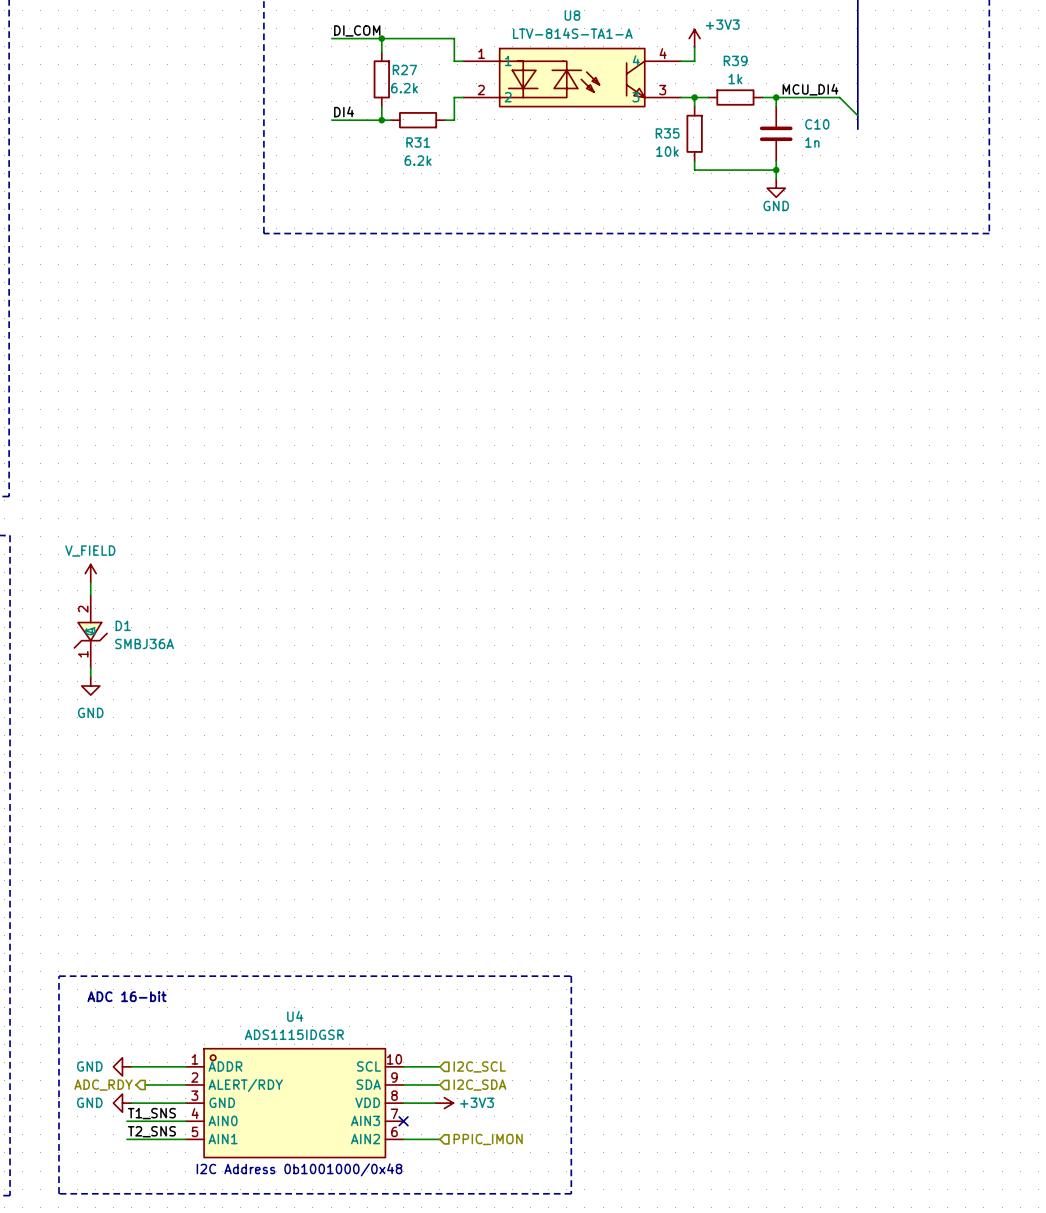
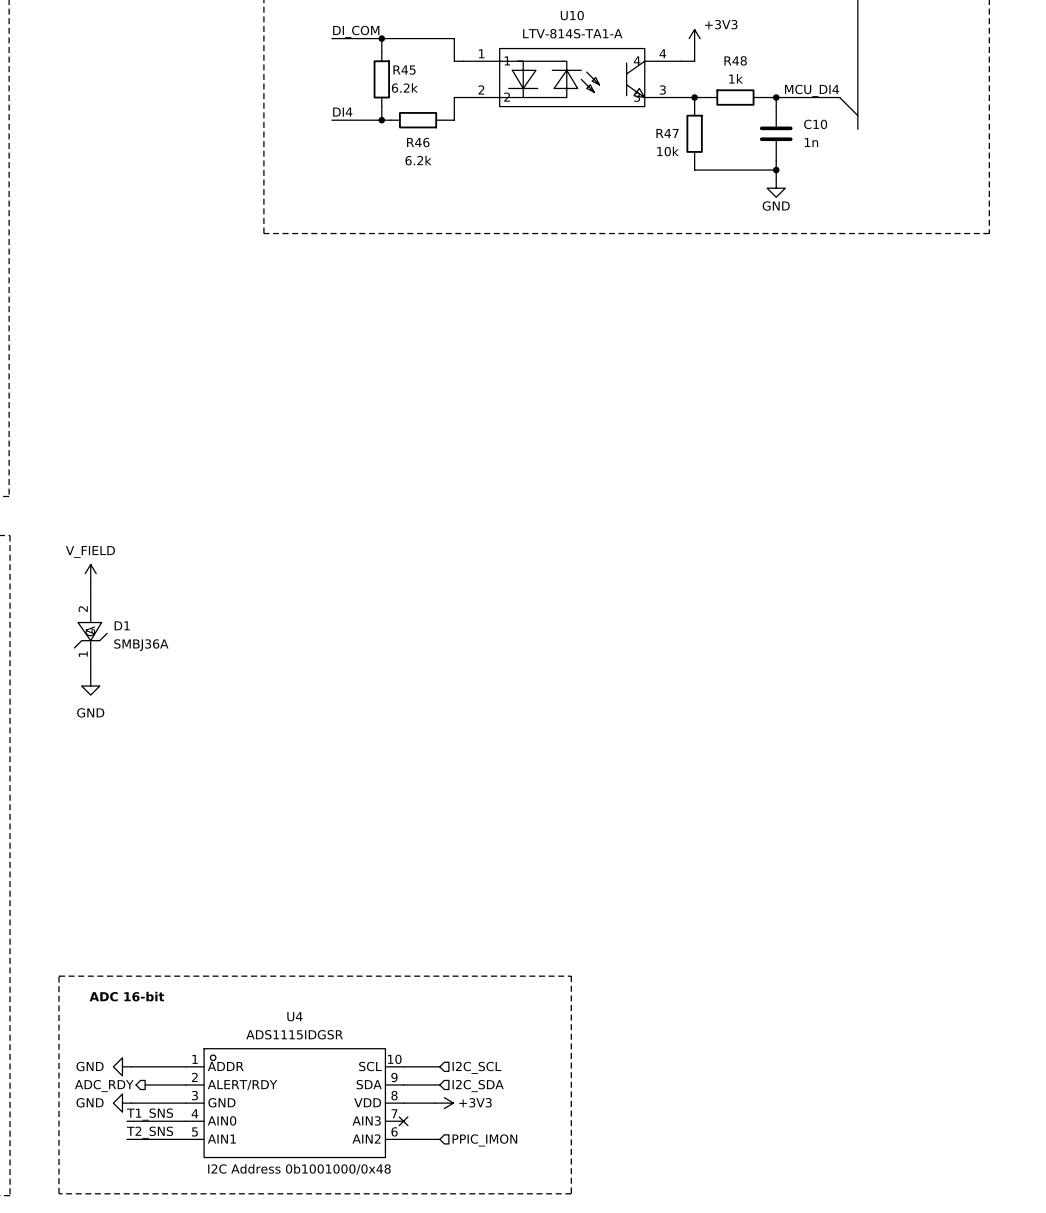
U8 name: U8 (572, 15) -> U10 (572, 15)
R39 name: R39 (735, 60) -> R48 (735, 60)
R27 name: R27 (404, 69) -> R45 (404, 70)
R35 name: R35 (667, 133) -> R47 (667, 133)
R31 name: R31 (418, 142) -> R46 (418, 142)

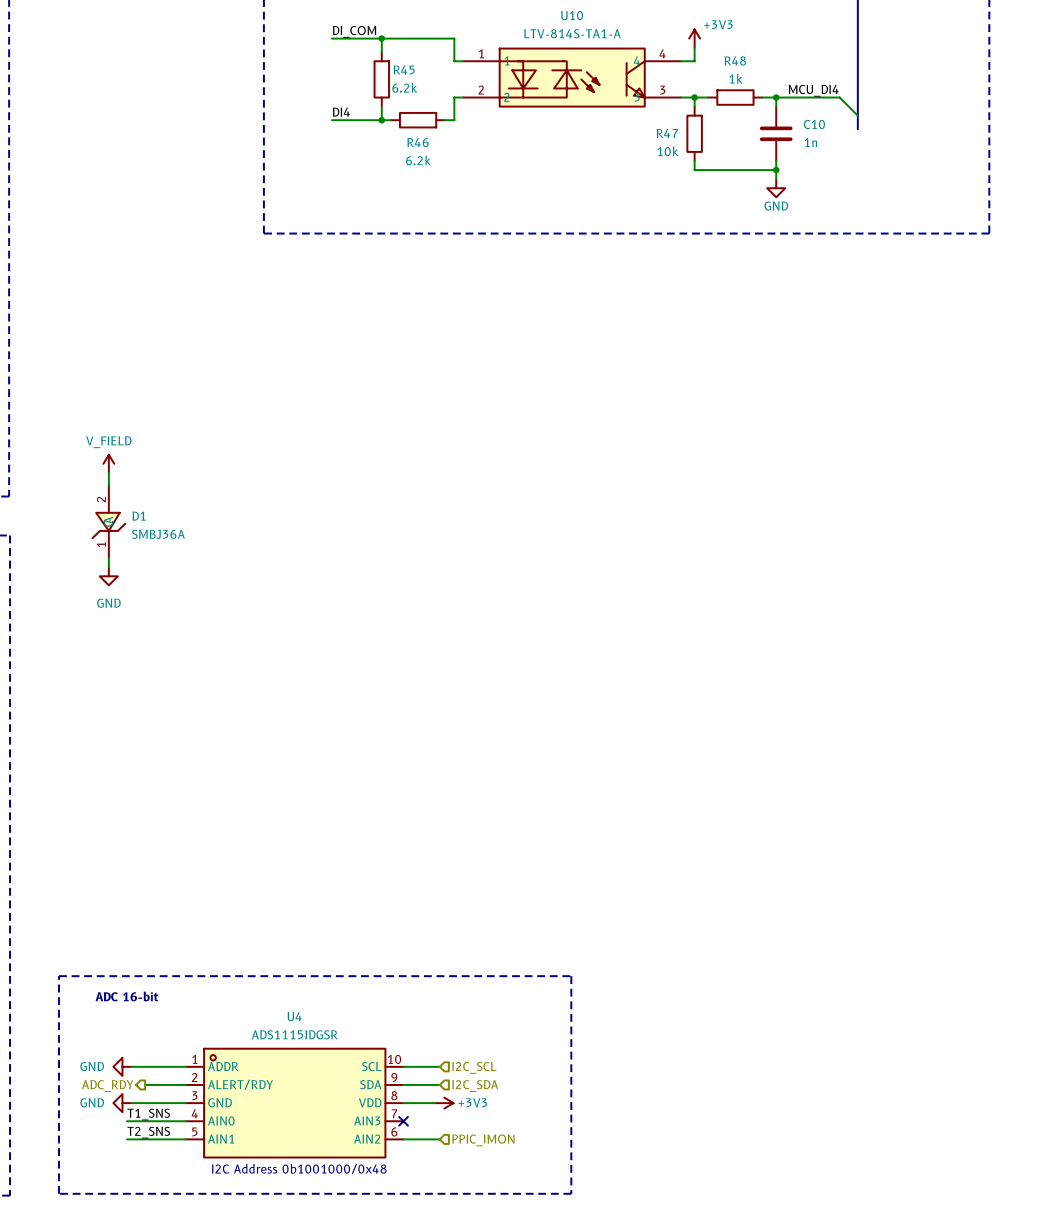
power symbol position: V_FIELD (90, 573) -> V_FIELD (108, 463)
wire: (90, 582) (90, 595) -> (108, 472) (108, 485)
D1 position: (90, 631) -> (108, 521)
wire: (90, 667) (90, 676) -> (108, 558) (108, 567)
power symbol position: GND (90, 686) -> GND (108, 576)

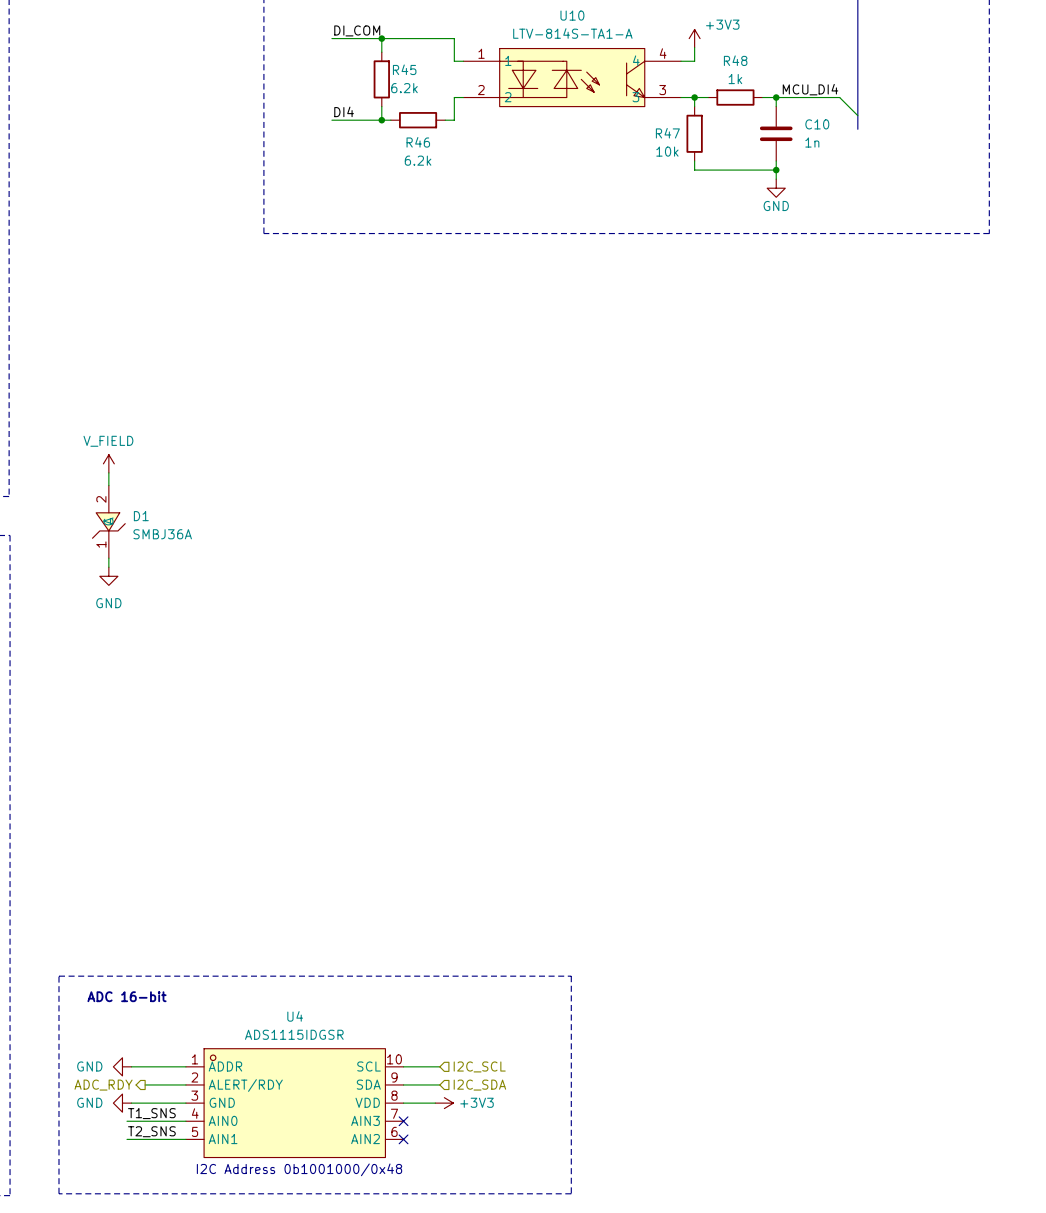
wire: (403, 1139) (439, 1139) -> none
no-connect mark: none -> (403, 1139)
hierarchical label: PPIC_IMON (483, 1140) -> none

